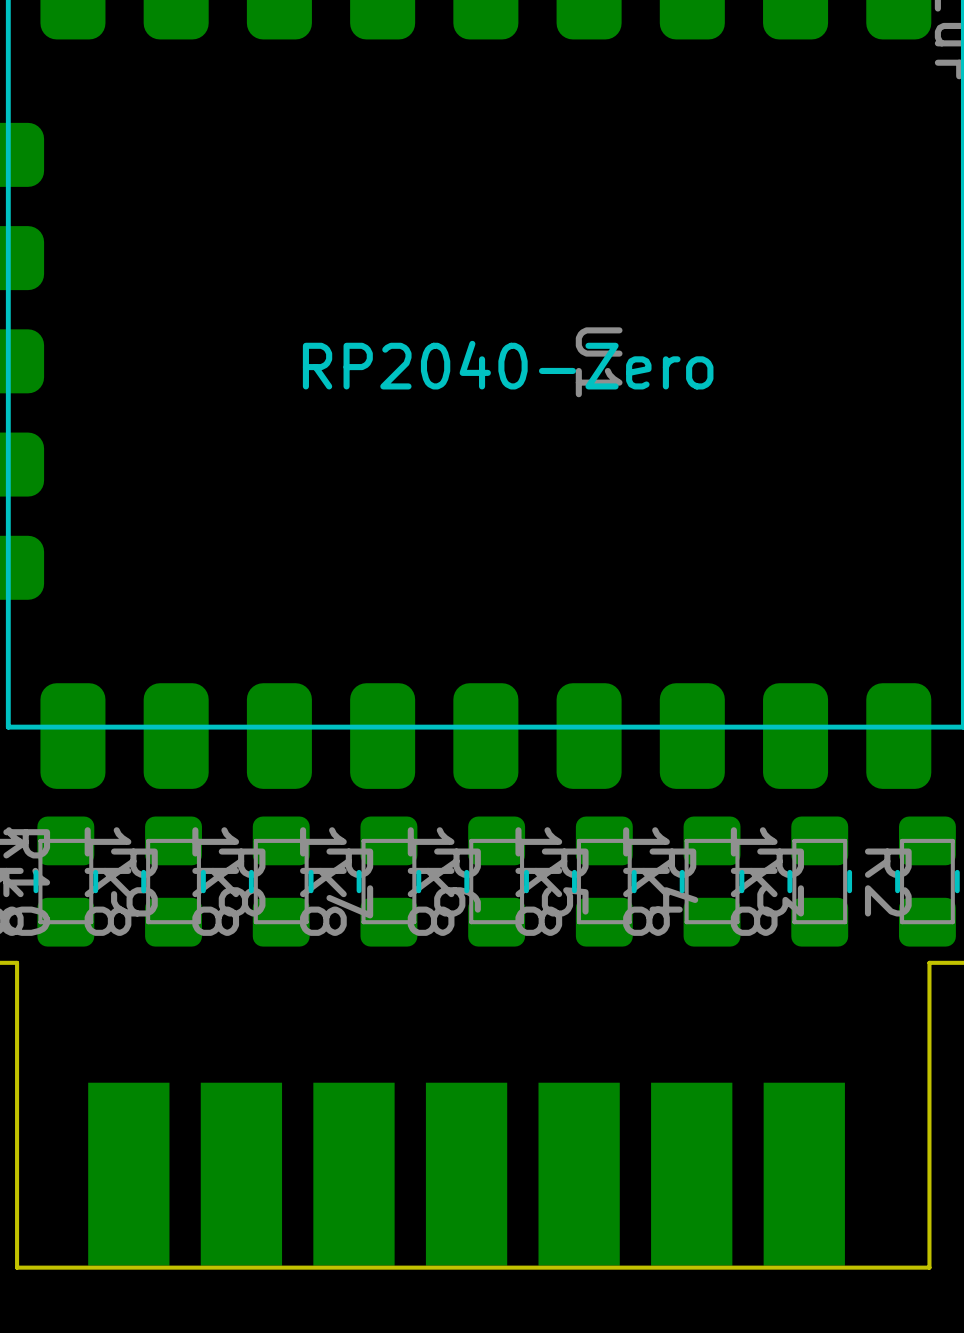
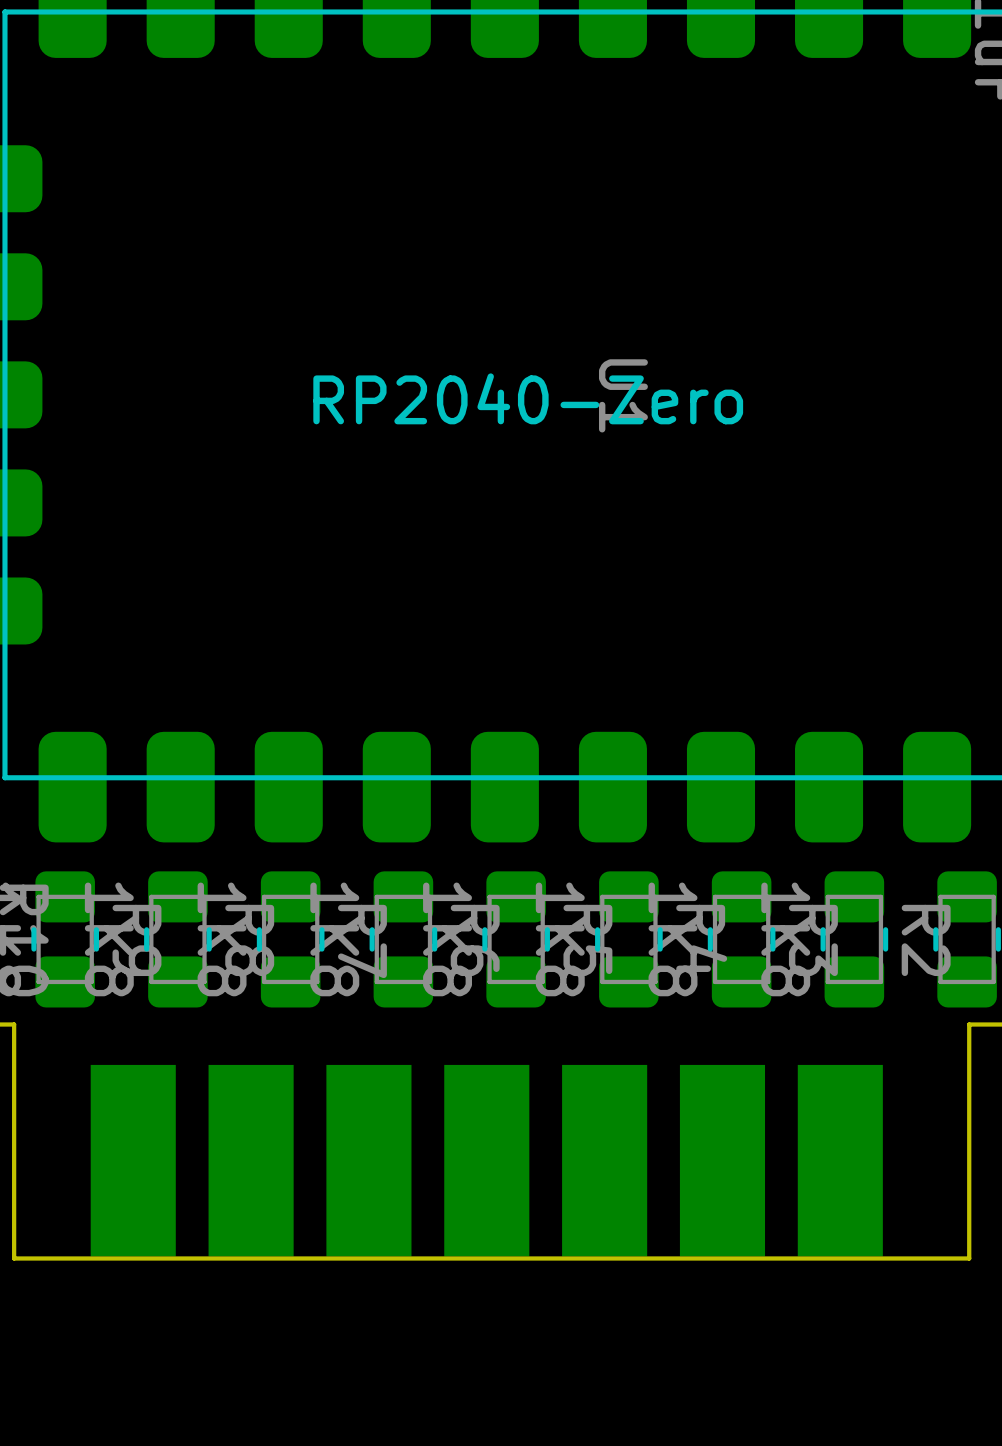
part position: (466, 1174) -> (486, 1160)
board edge: (929, 1186) (929, 1267) (17, 1267) (17, 1186) -> (969, 1258) (14, 1258)

